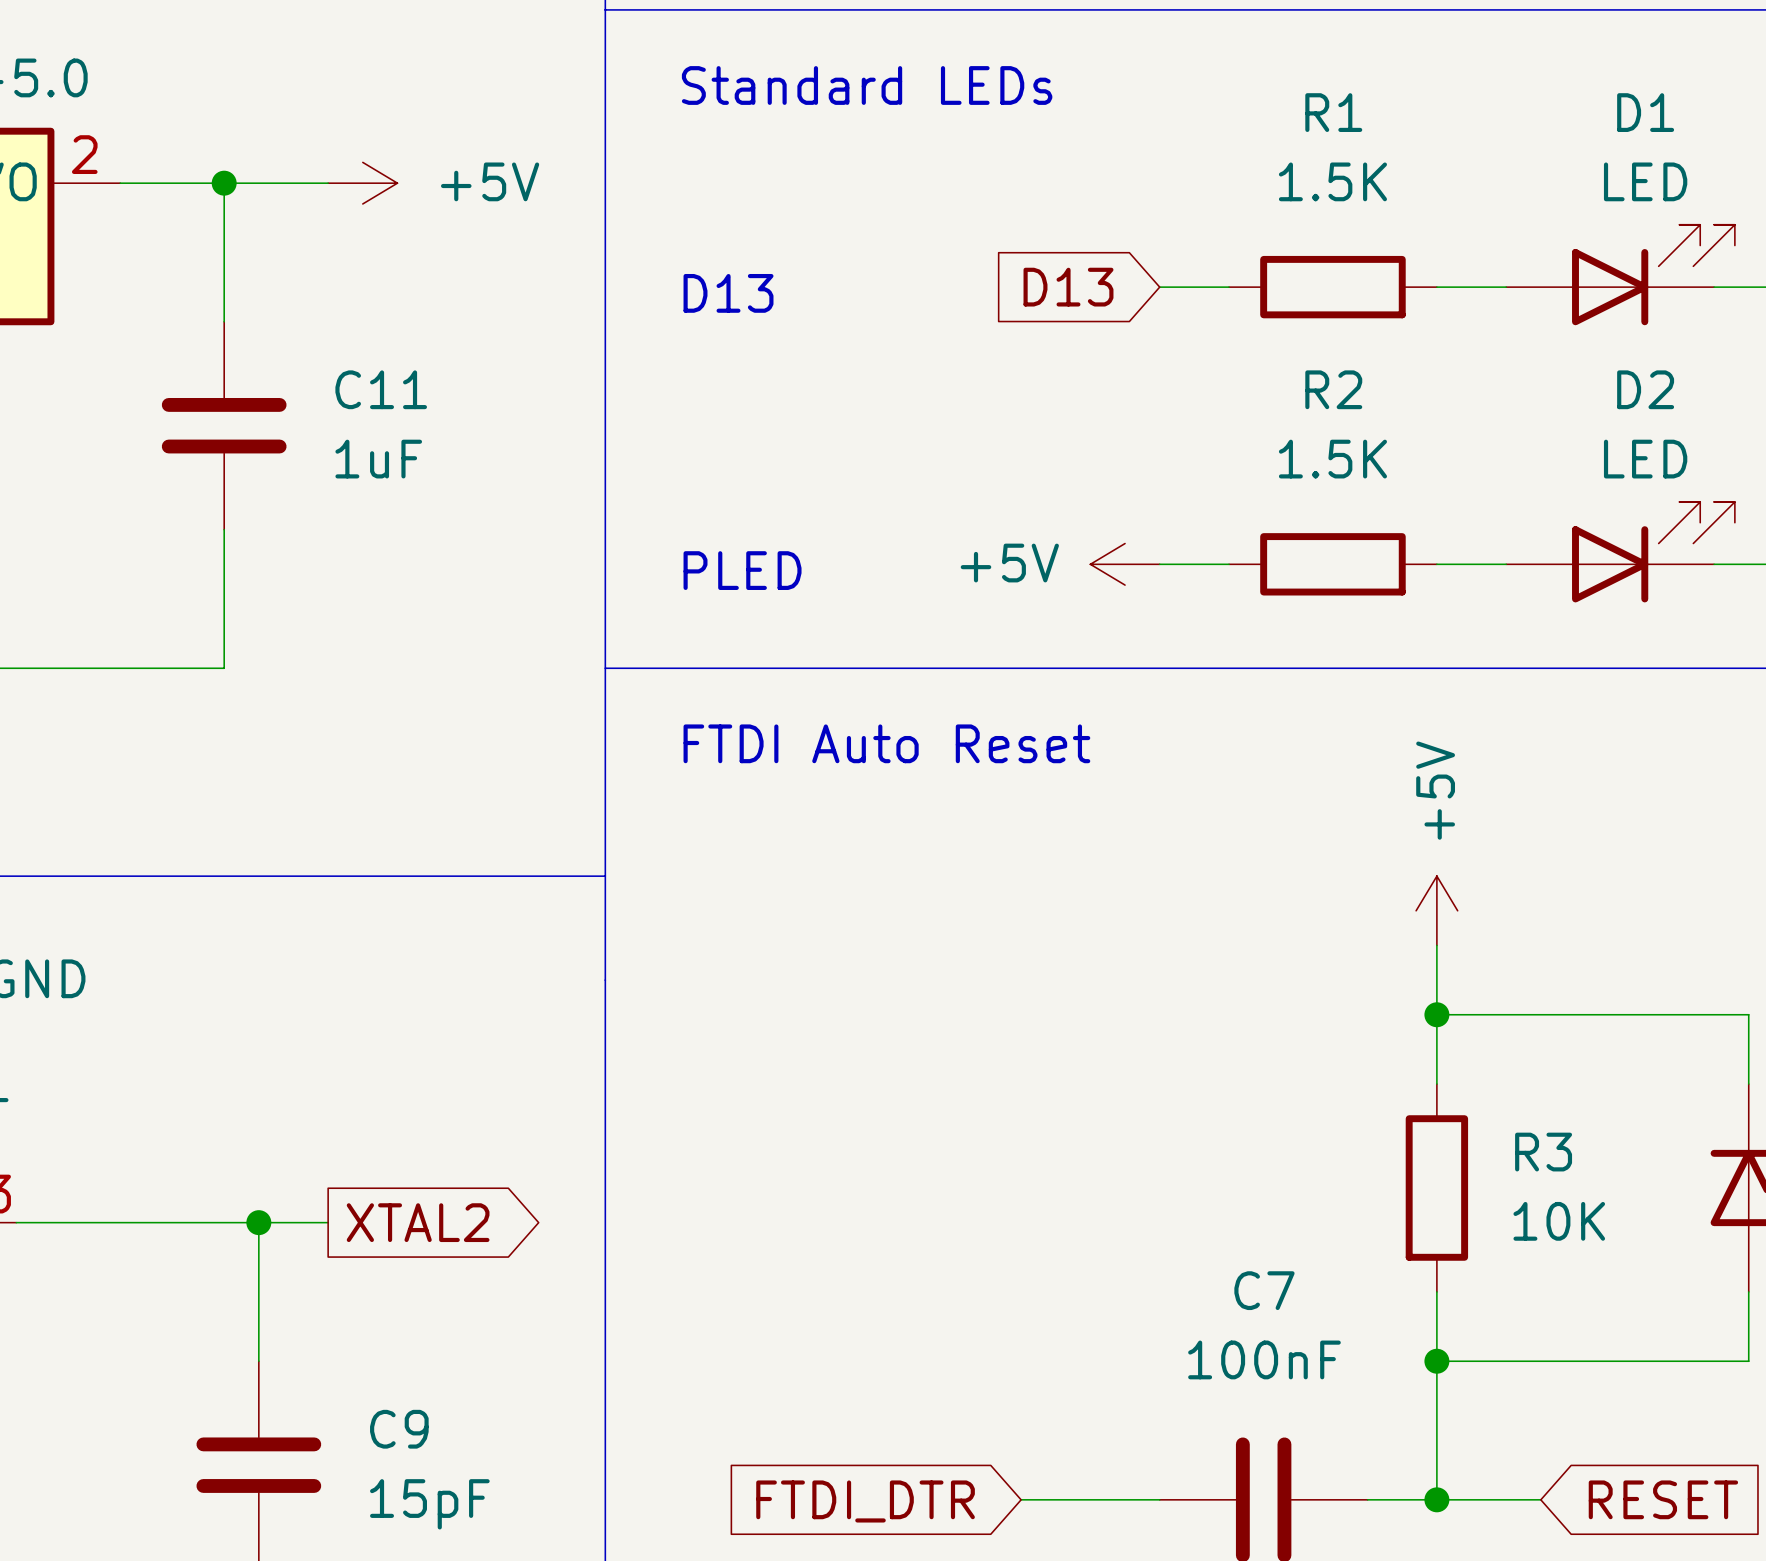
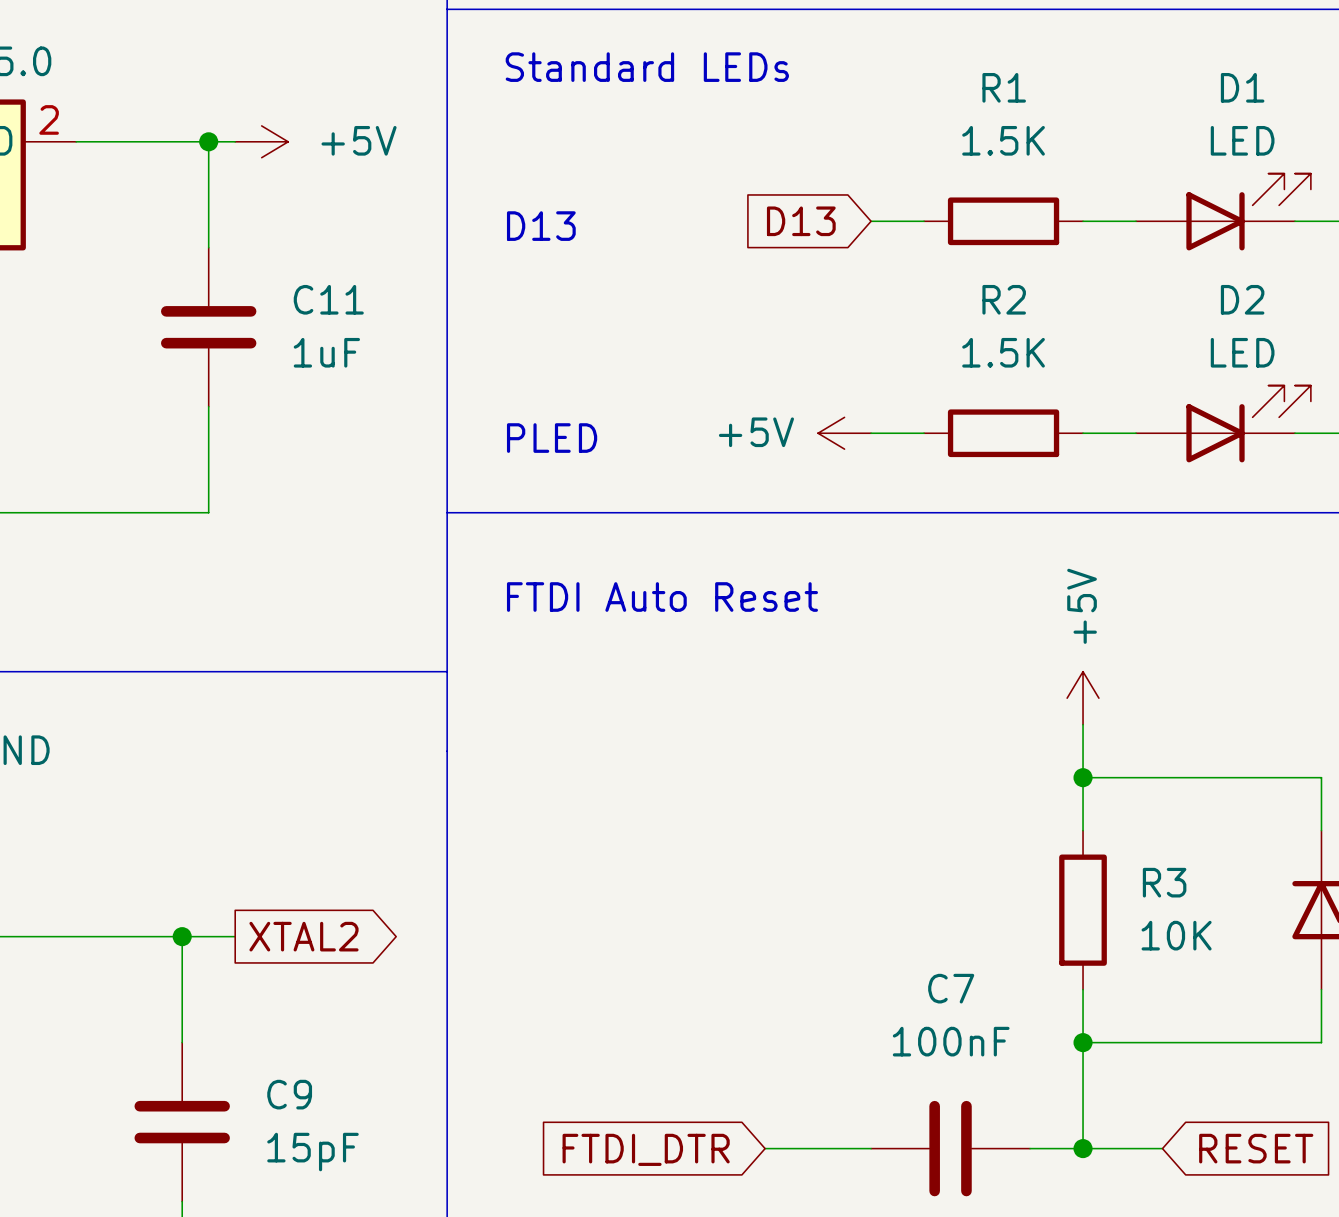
wire: (224, 183) (224, 321) -> (208, 141) (208, 247)
junction position: (224, 183) -> (208, 141)
C11 position: (224, 425) -> (208, 327)
wire: (224, 529) (224, 668) -> (208, 406) (208, 512) (155, 512)
text position: FTDI Auto Reset (886, 743) -> FTDI Auto Reset (662, 597)

